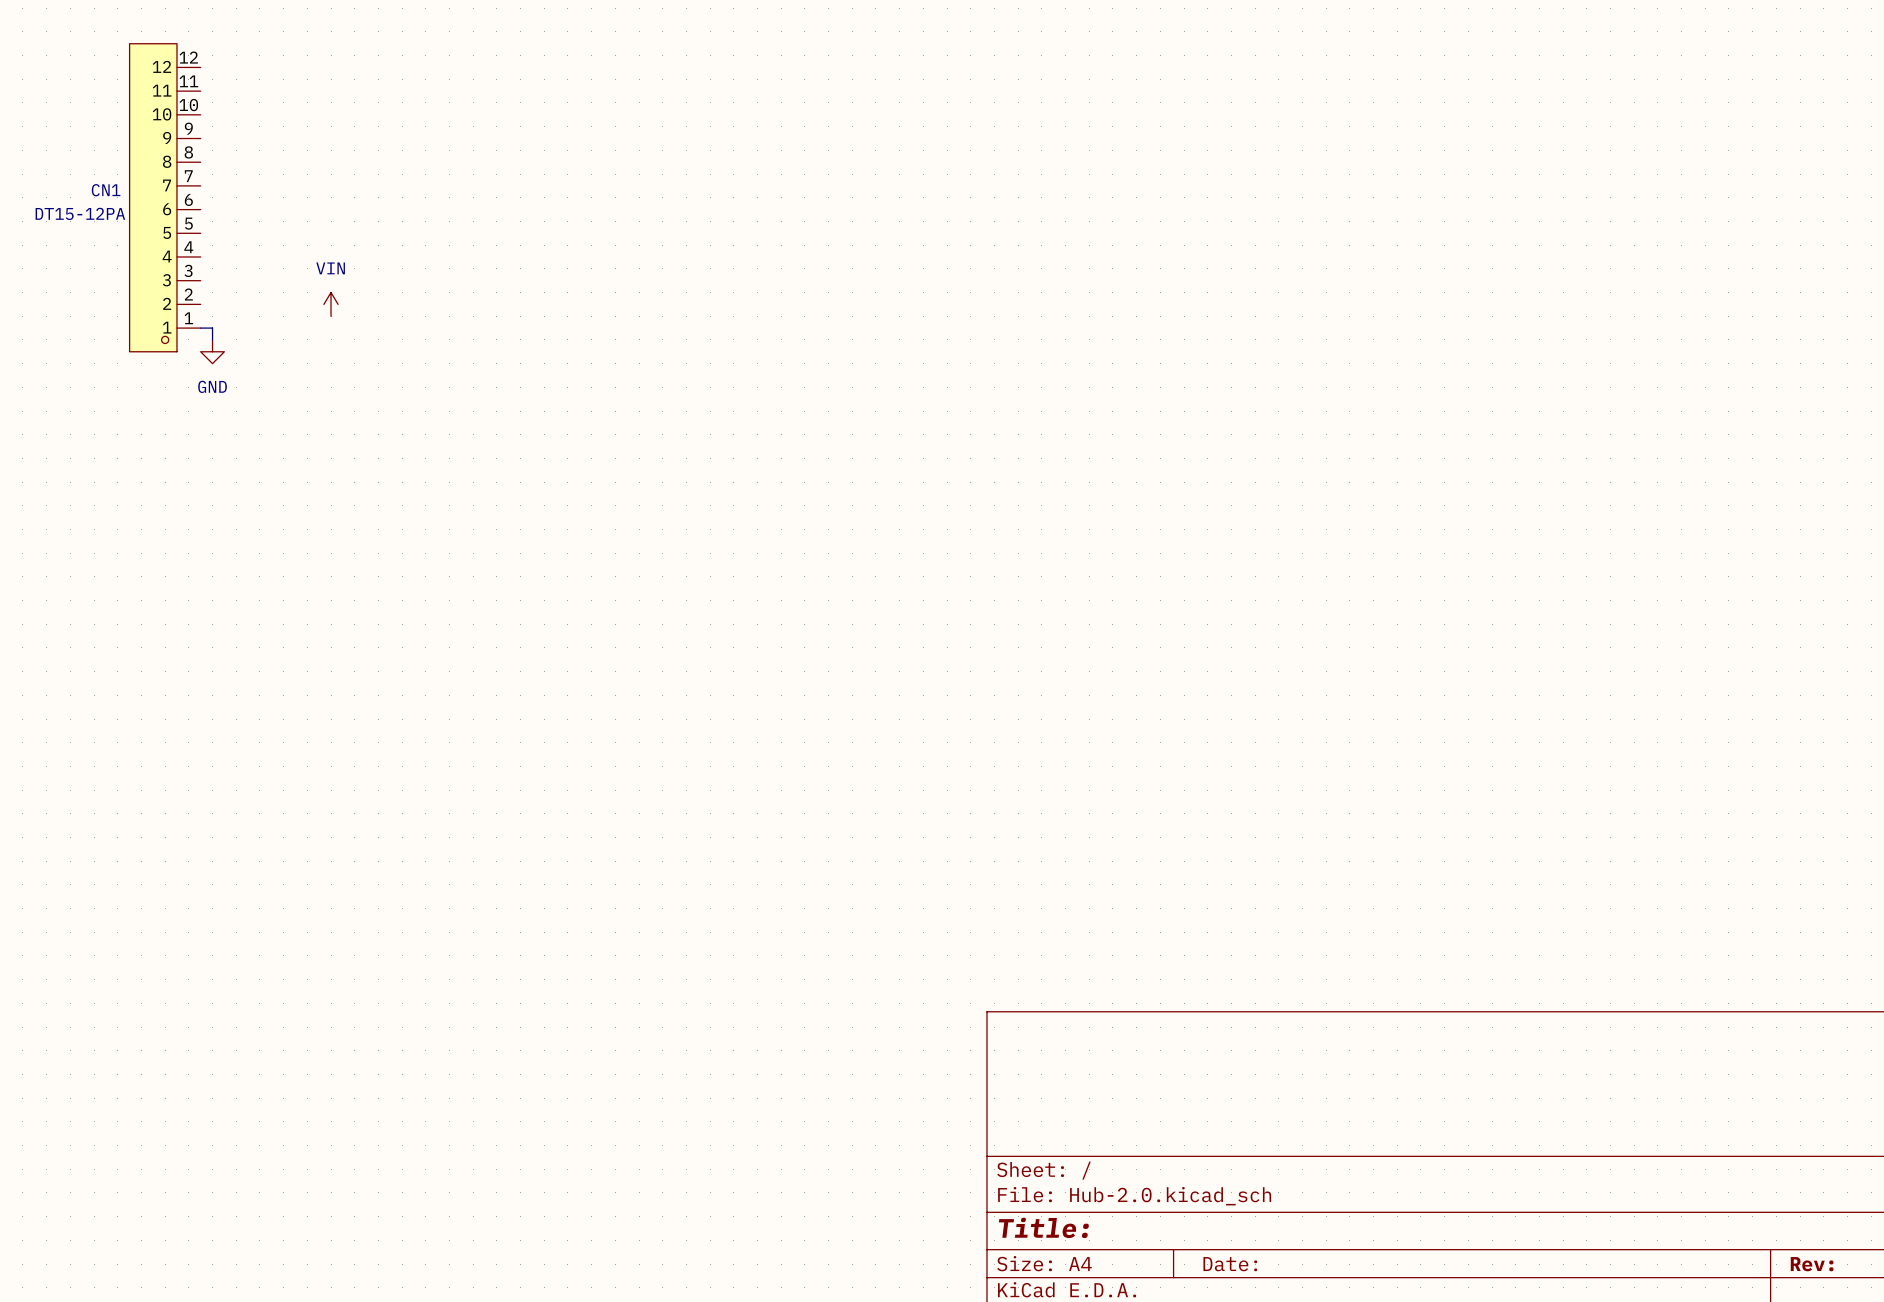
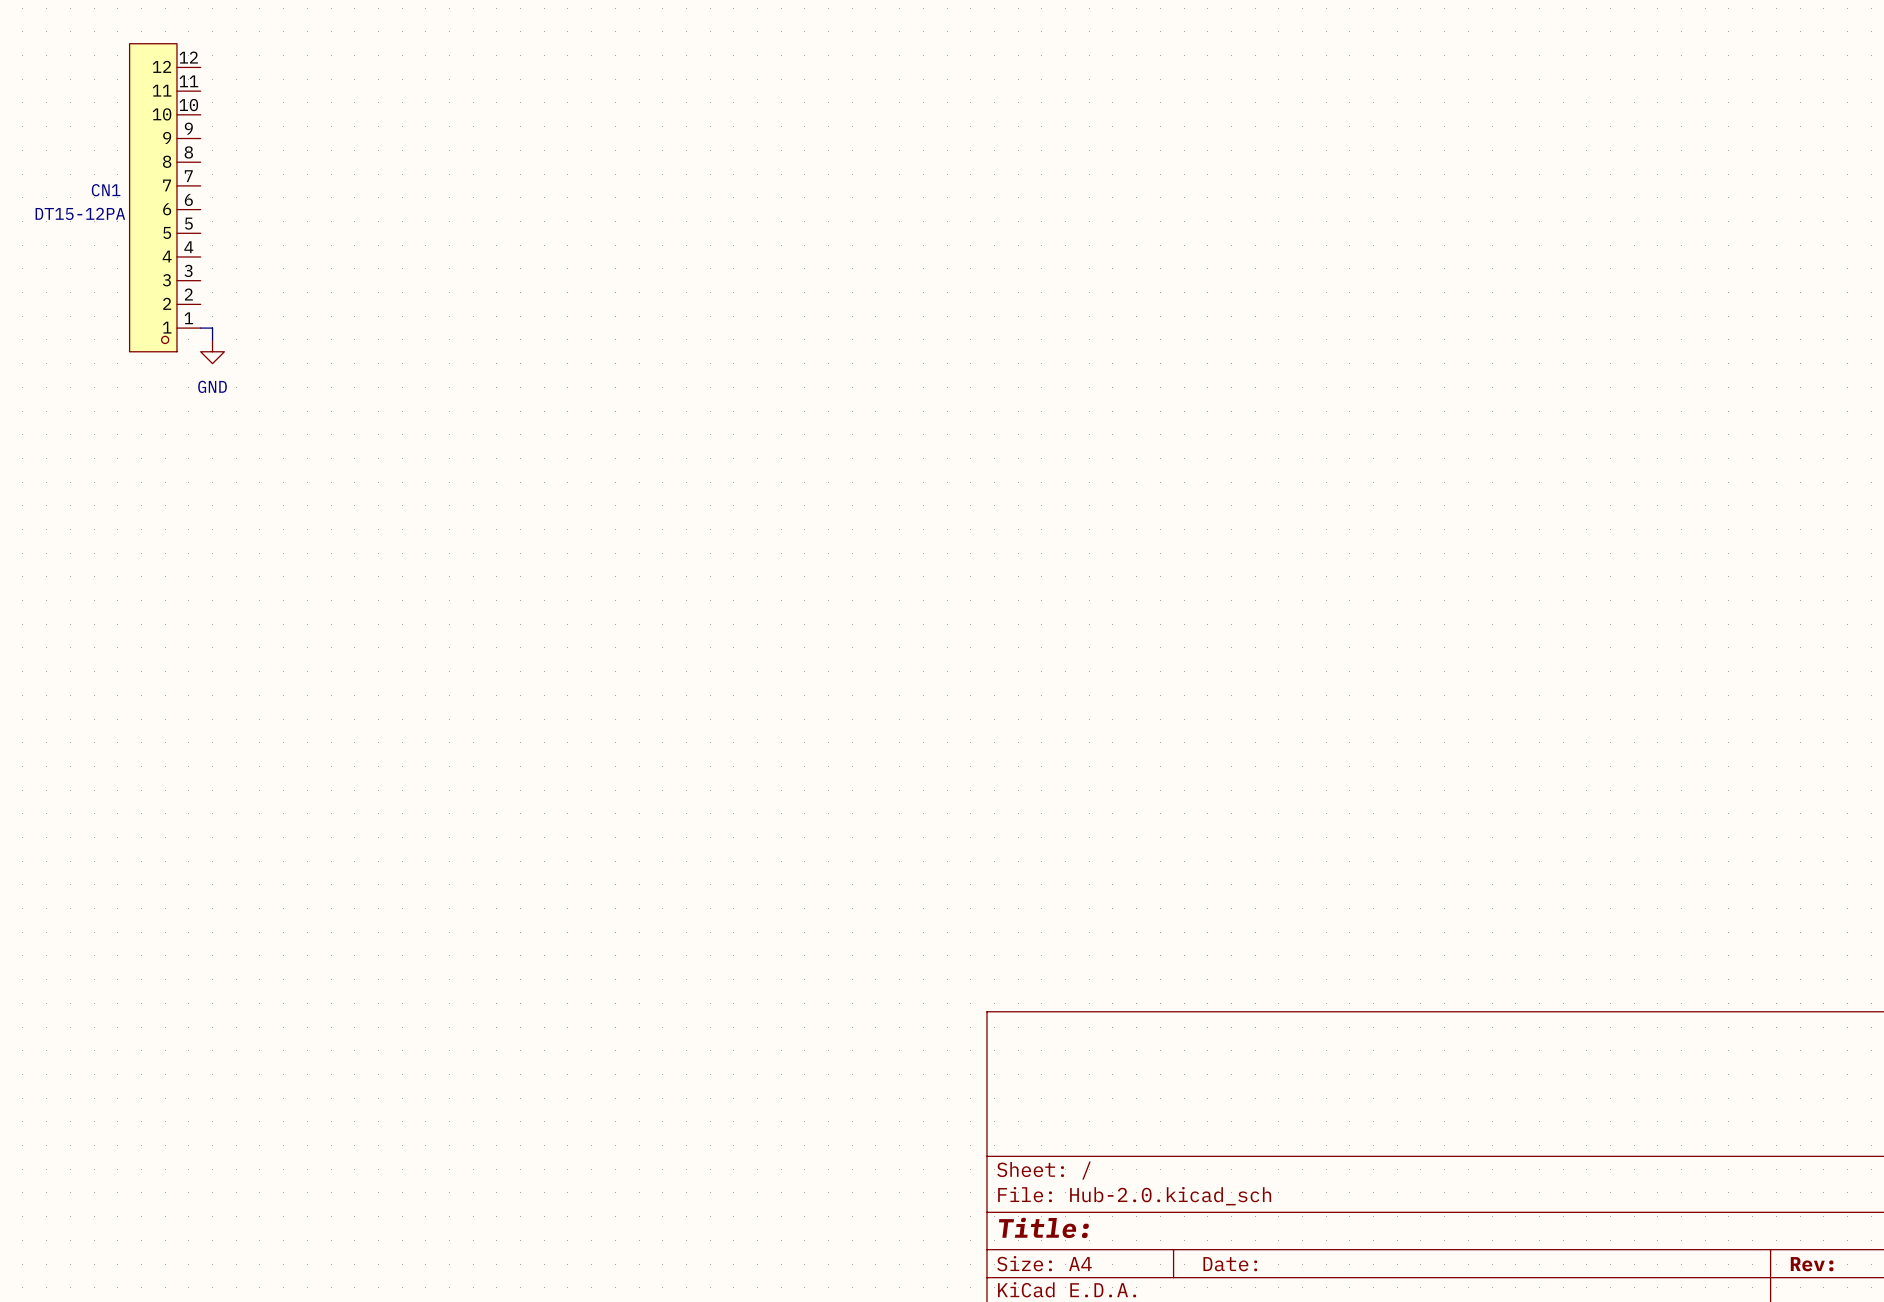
power symbol: VIN (331, 304) -> none

